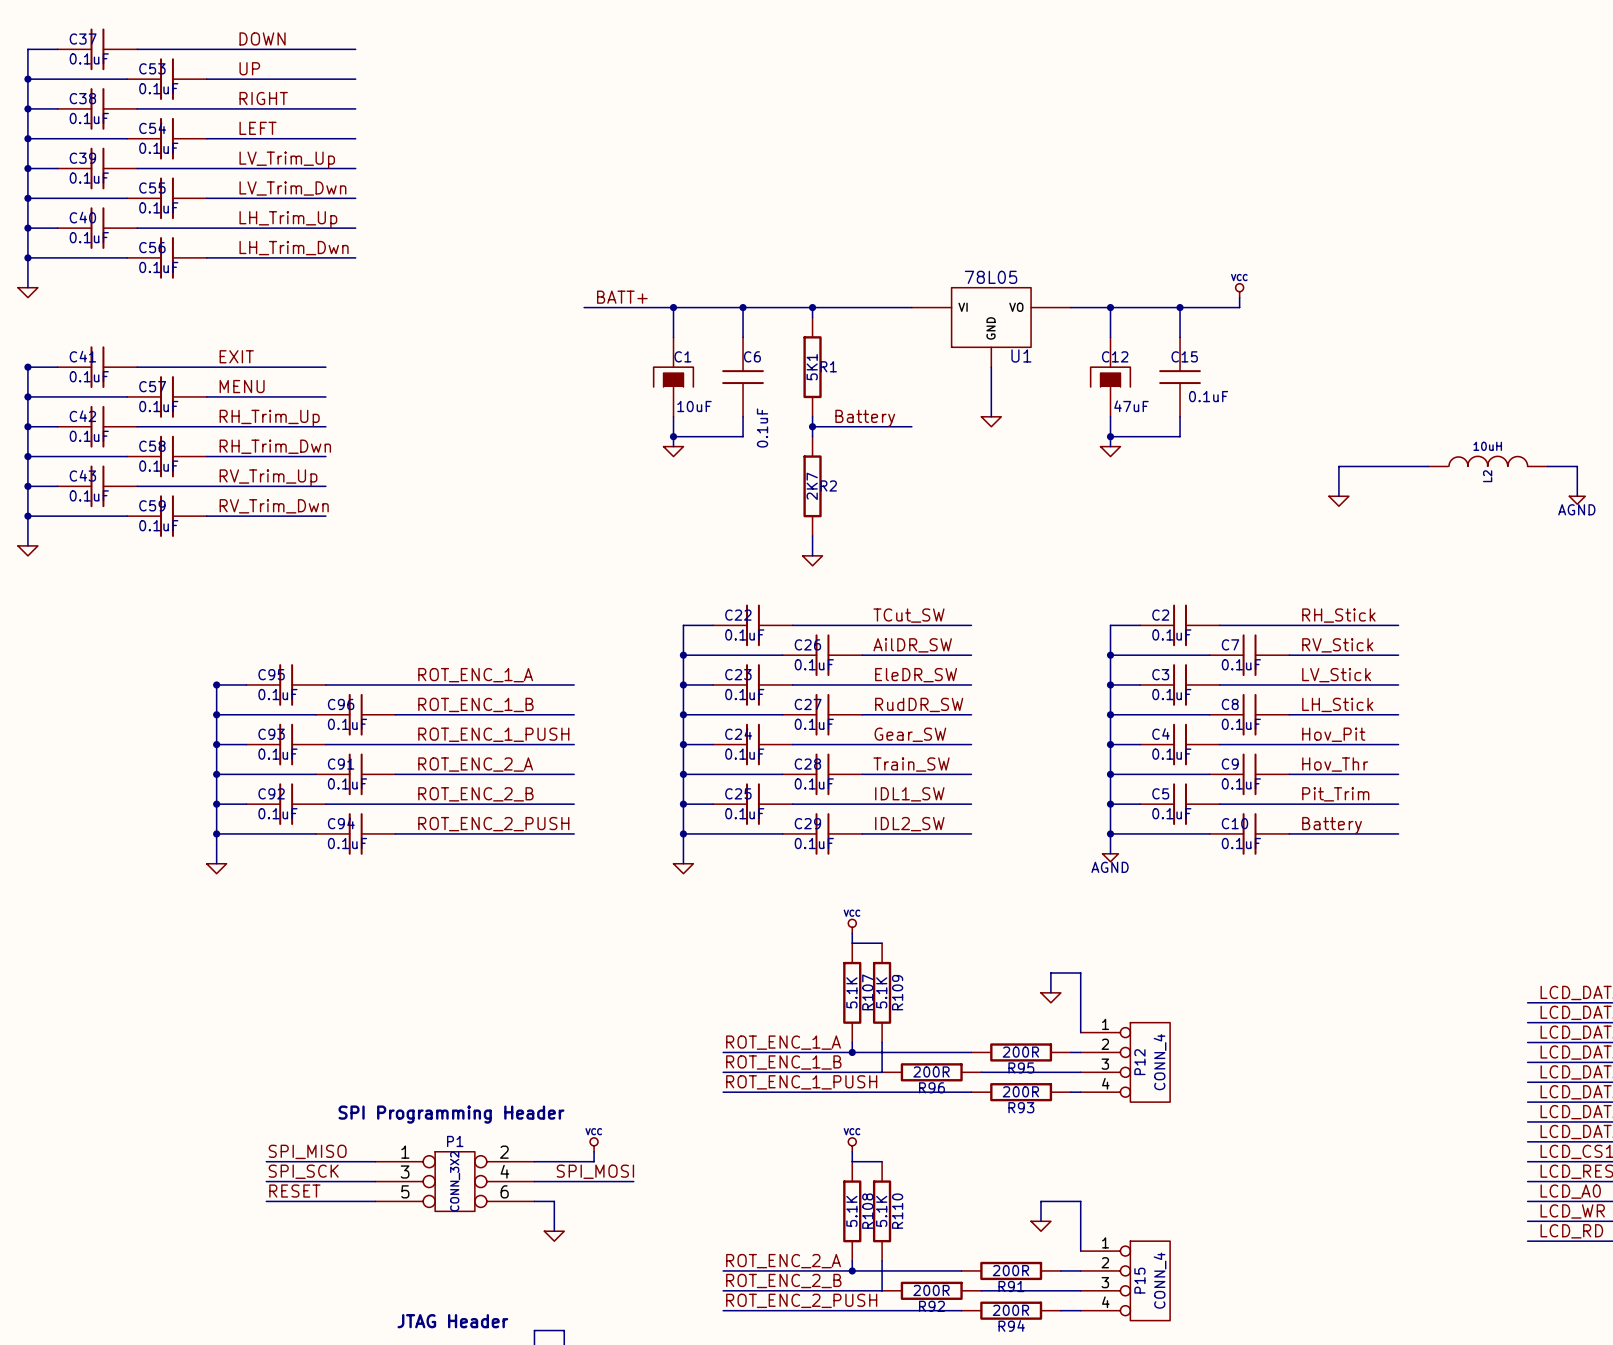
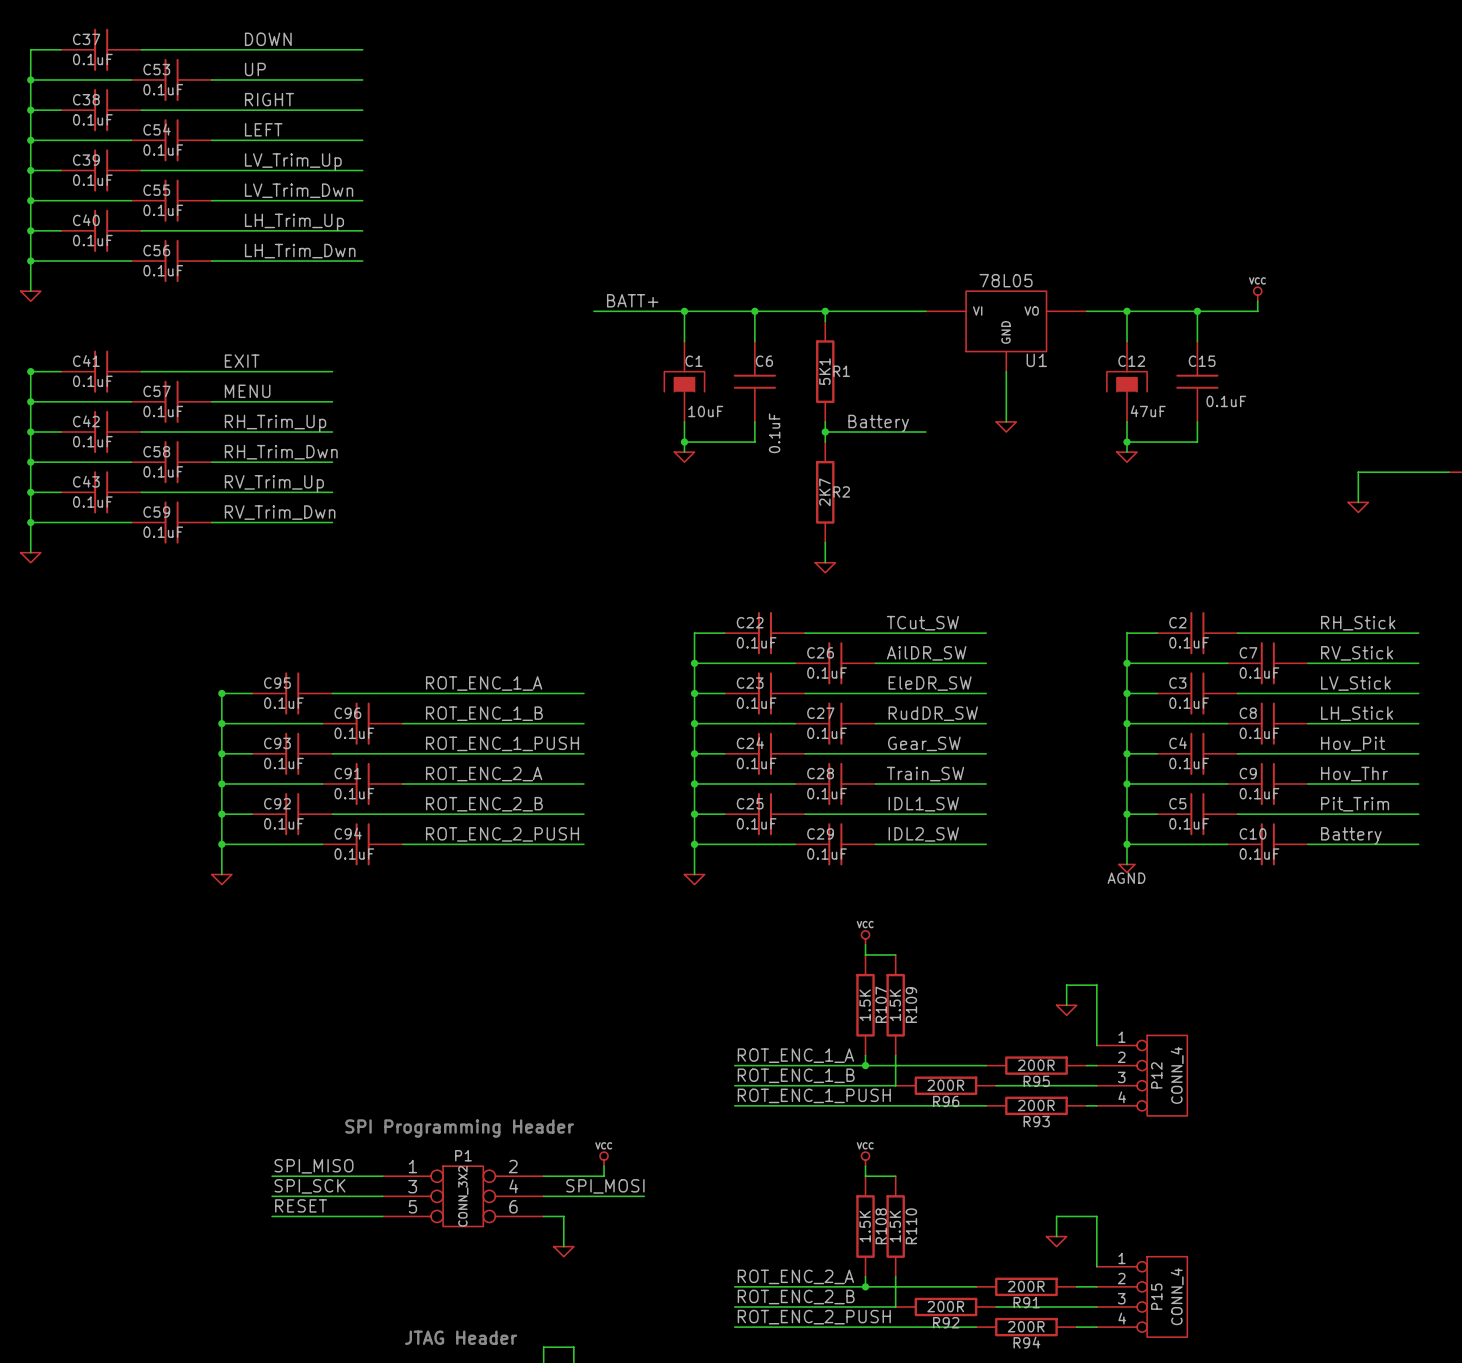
R107 value: 5.1K (851, 992) -> 1.5K (865, 1005)
R109 value: 5.1K (881, 992) -> 1.5K (895, 1005)
R108 value: 5.1K (851, 1211) -> 1.5K (865, 1226)
R110 value: 5.1K (881, 1211) -> 1.5K (895, 1226)

